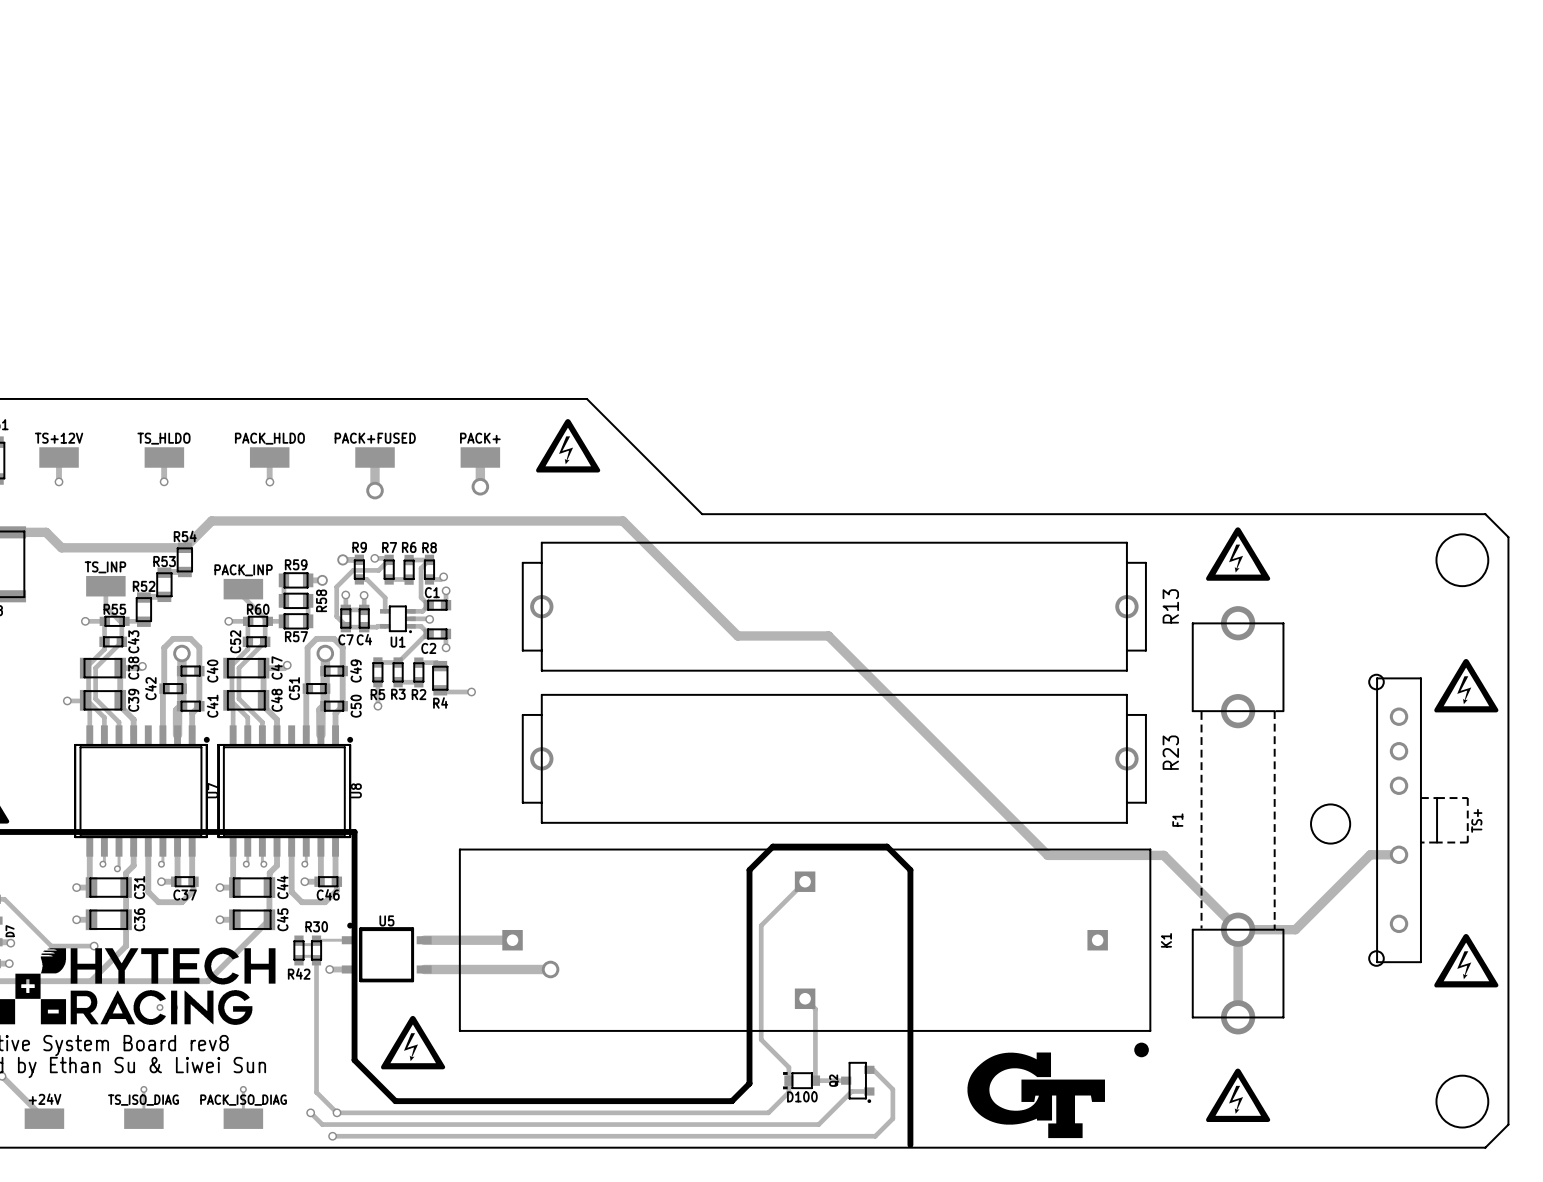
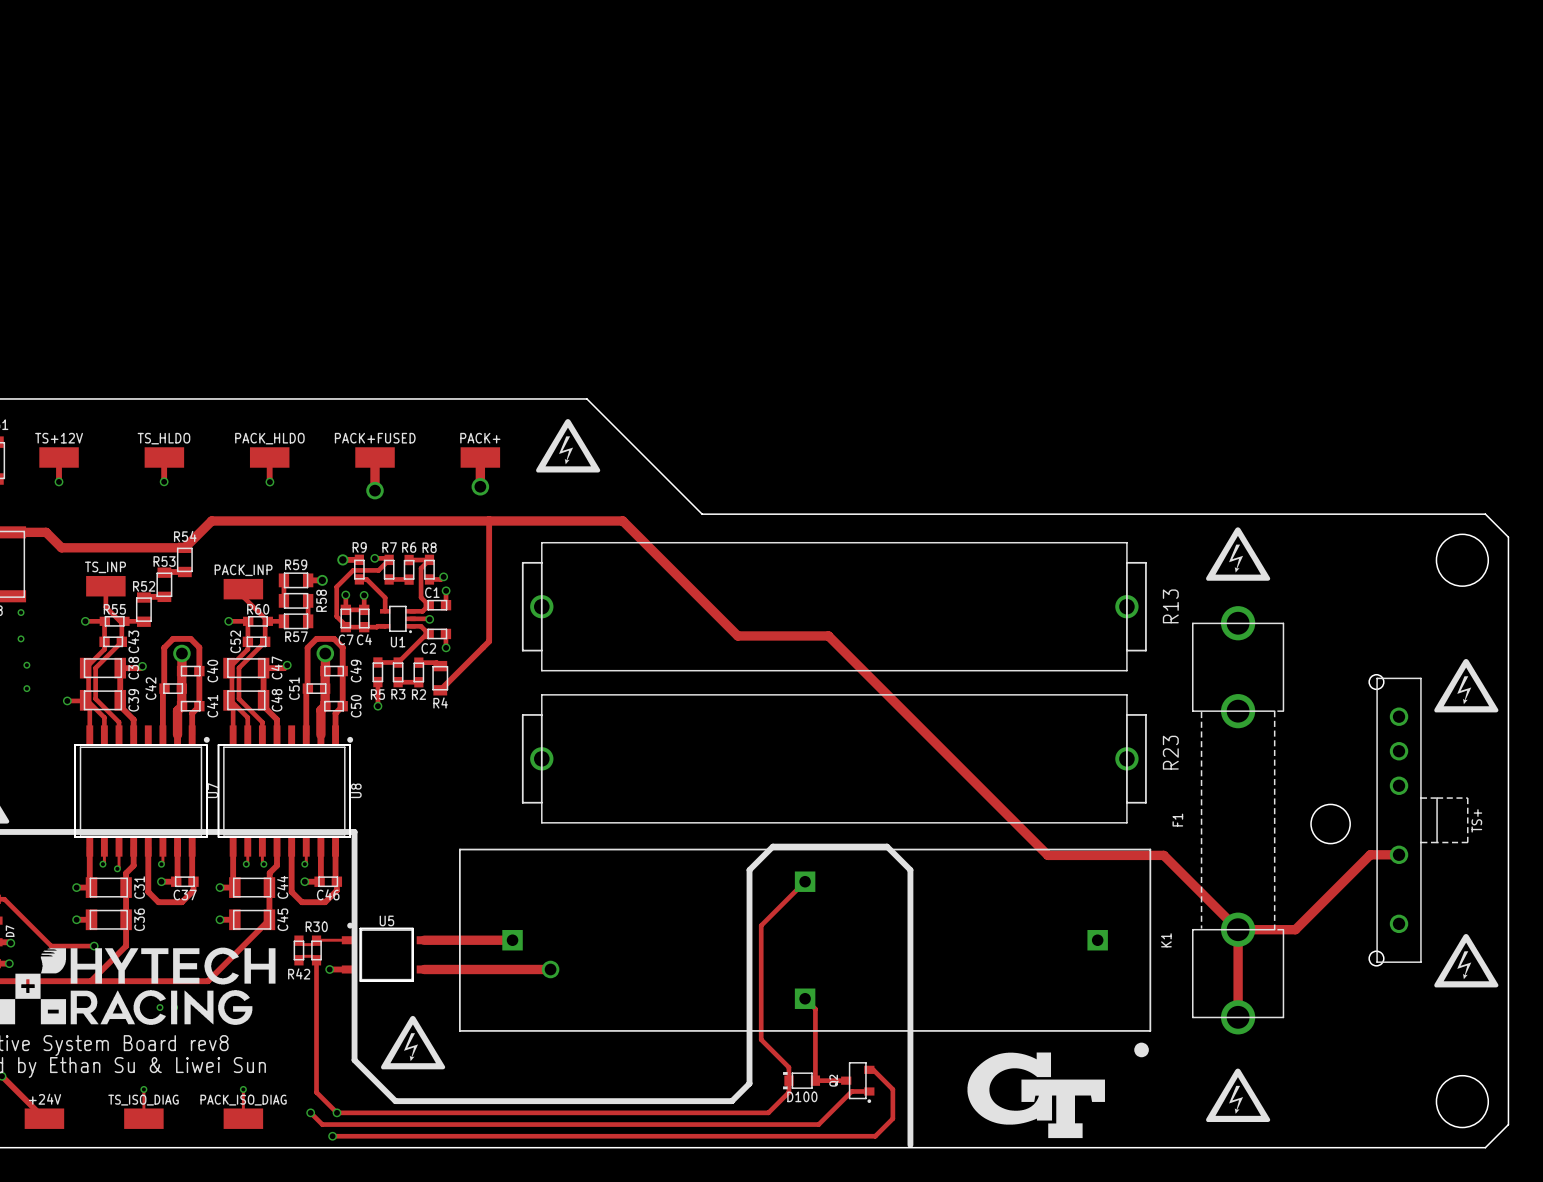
via: none -> (21, 612)
via: none -> (21, 638)
via: none -> (26, 665)
via: none -> (26, 688)
track: (440, 690) (441, 692) (471, 692) -> (440, 690) (489, 641) (489, 520)
via: (471, 692) -> none

